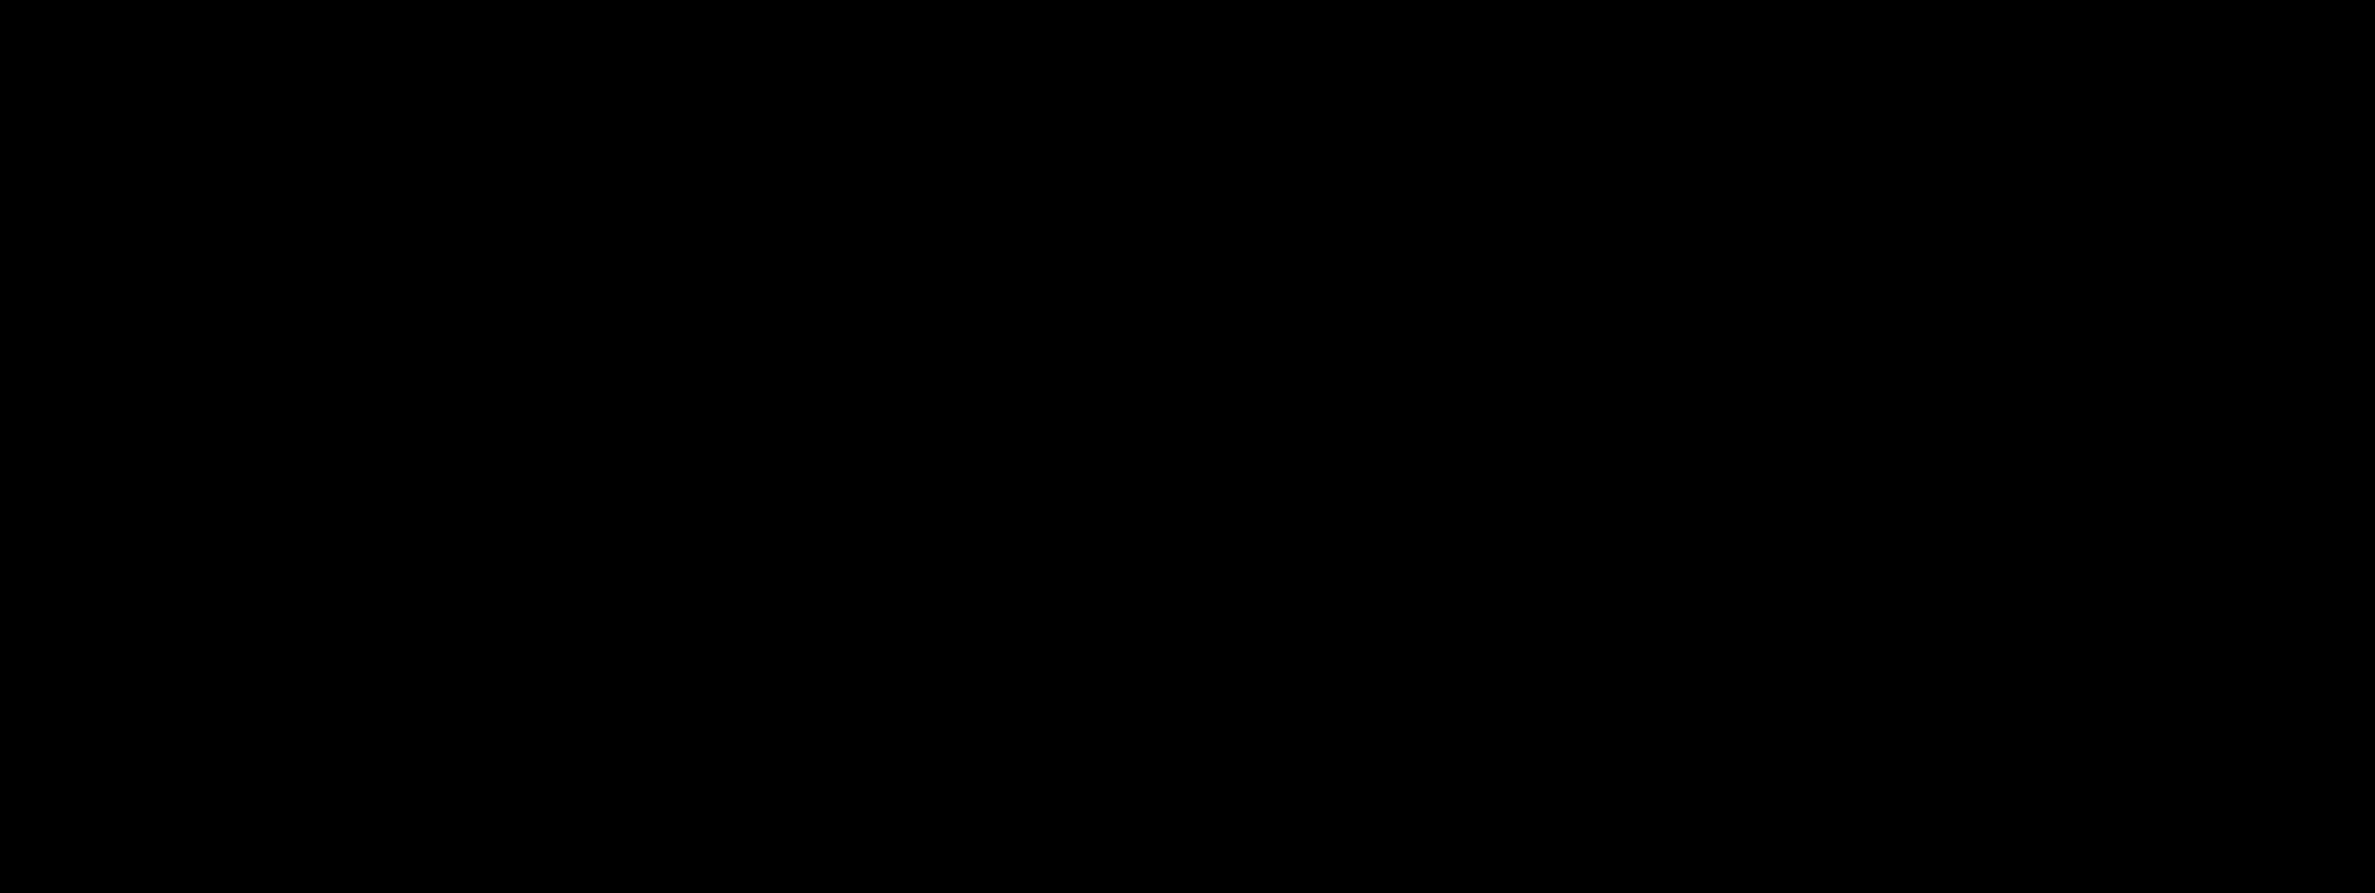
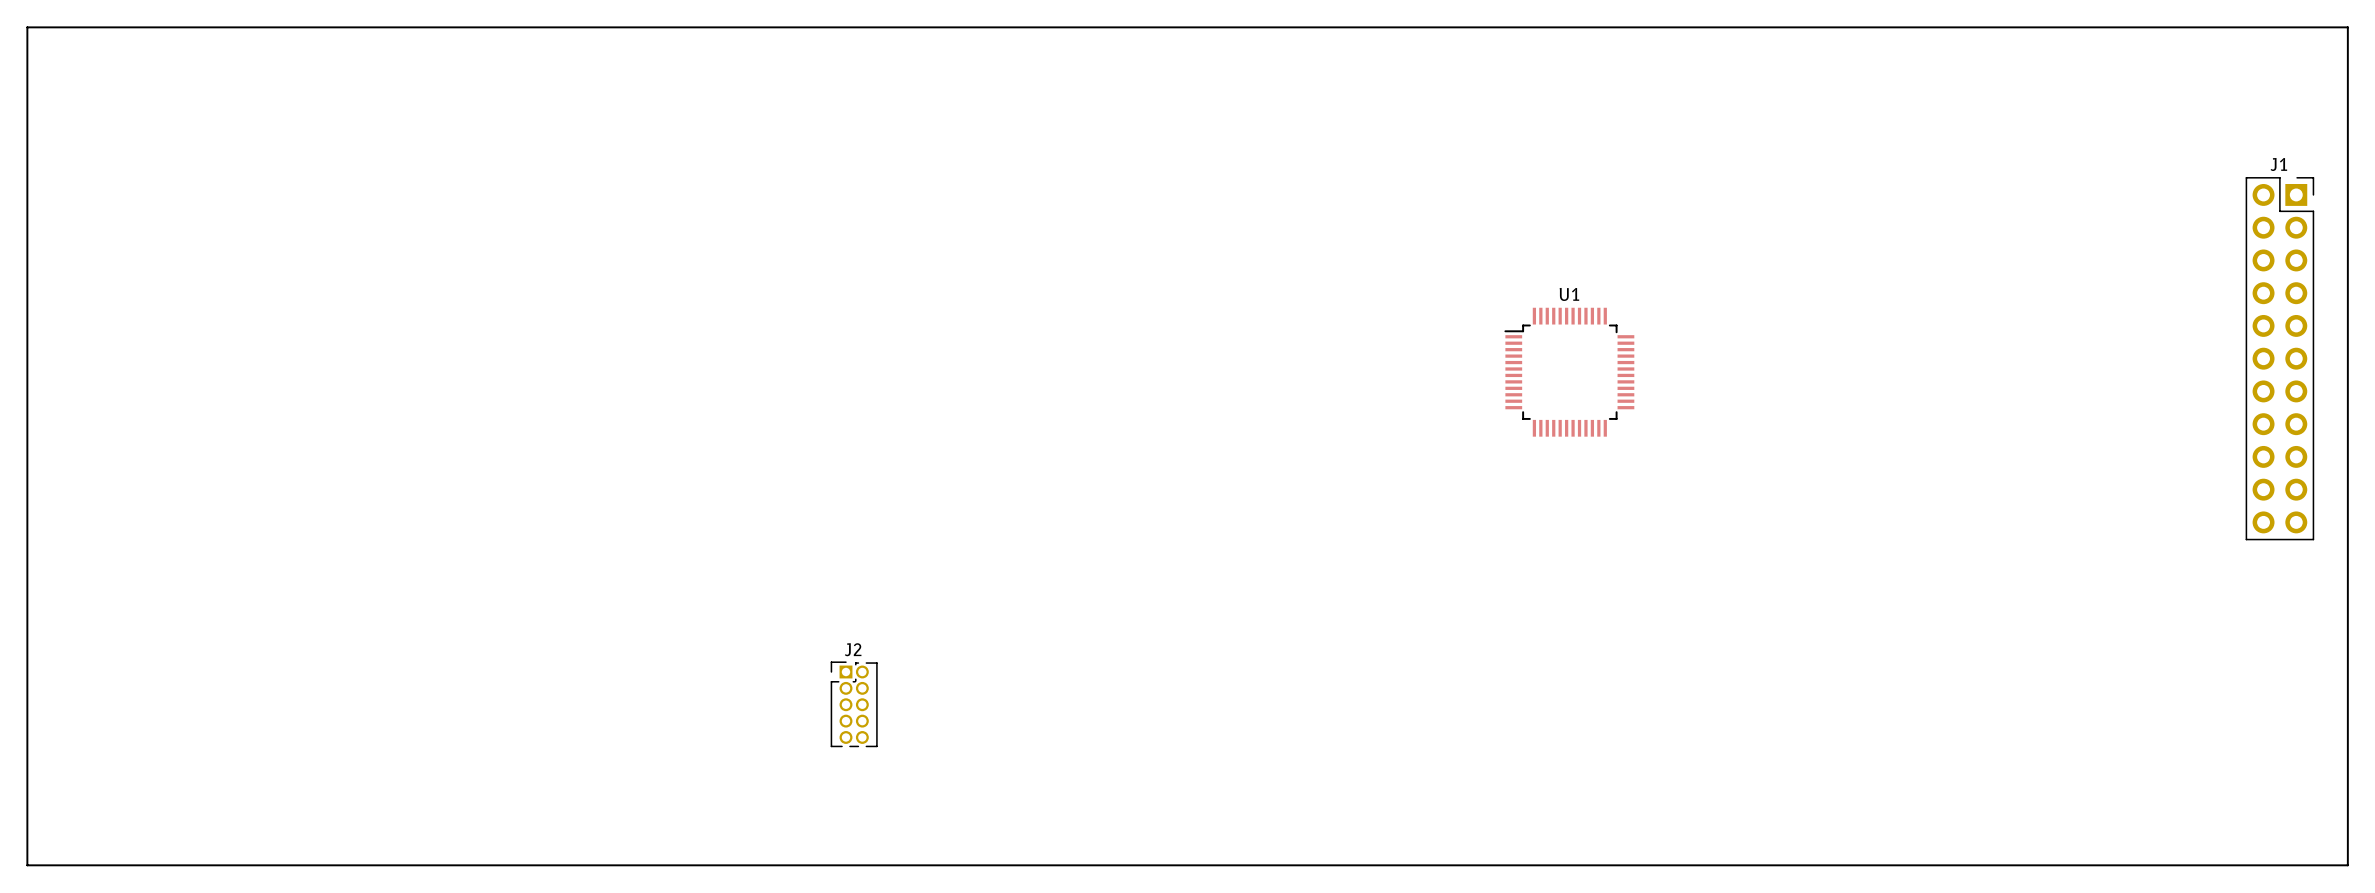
board edge: none -> (27, 27) (27, 865) (2347, 865) (2347, 27) (27, 27)
J1: none -> (2279, 358)
U1: none -> (1569, 372)
J2: none -> (854, 704)

